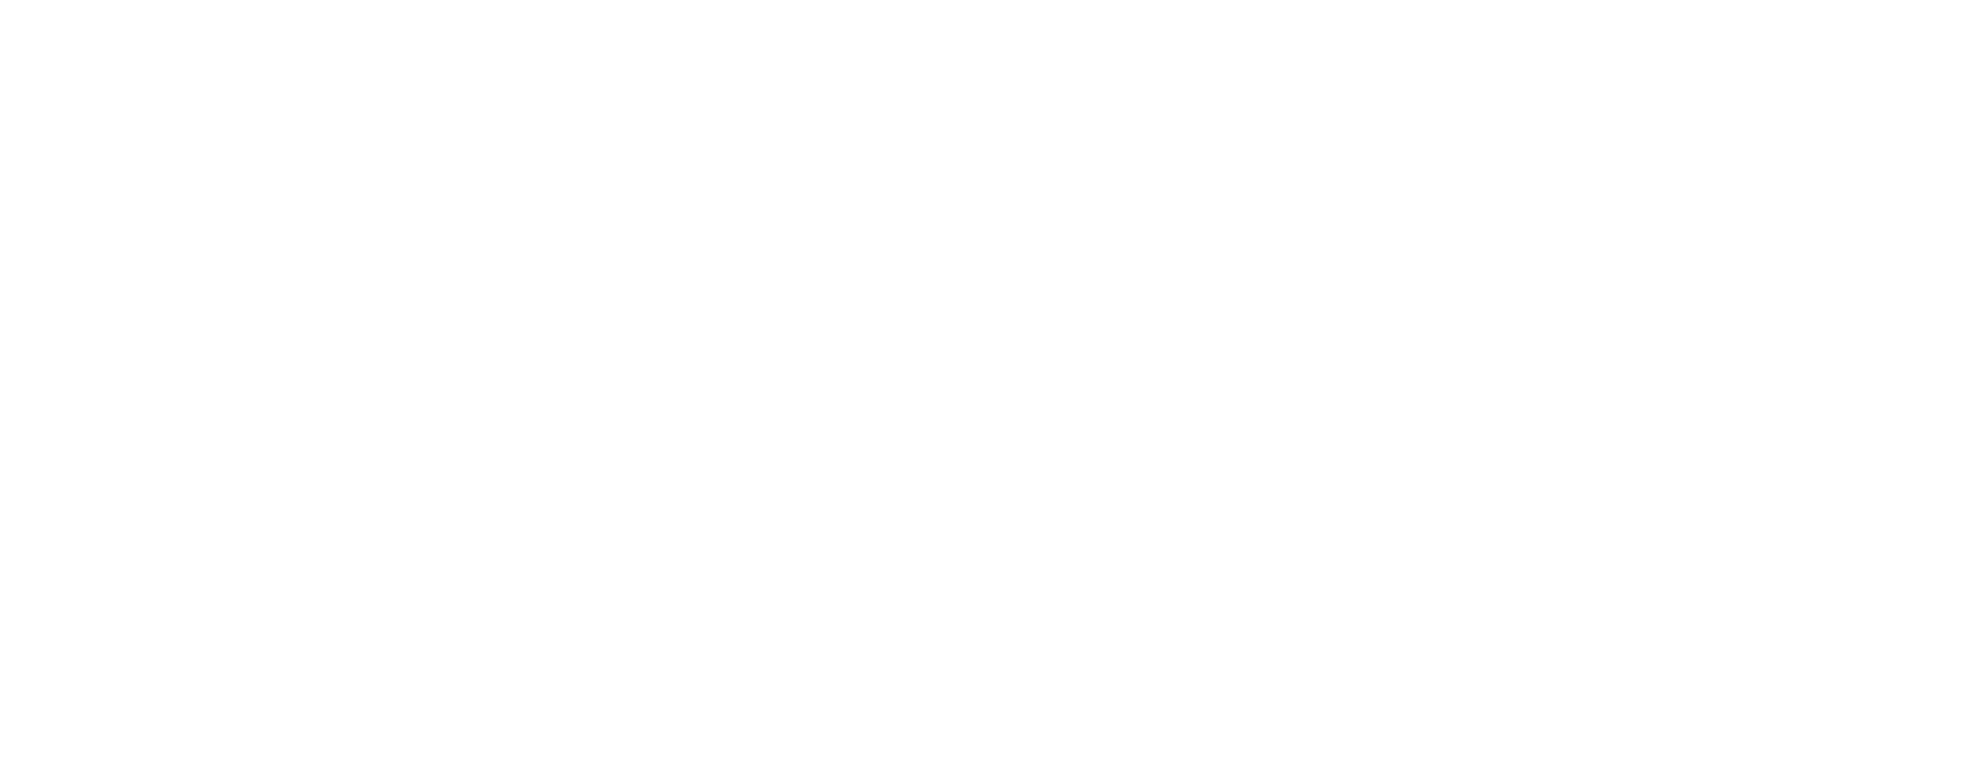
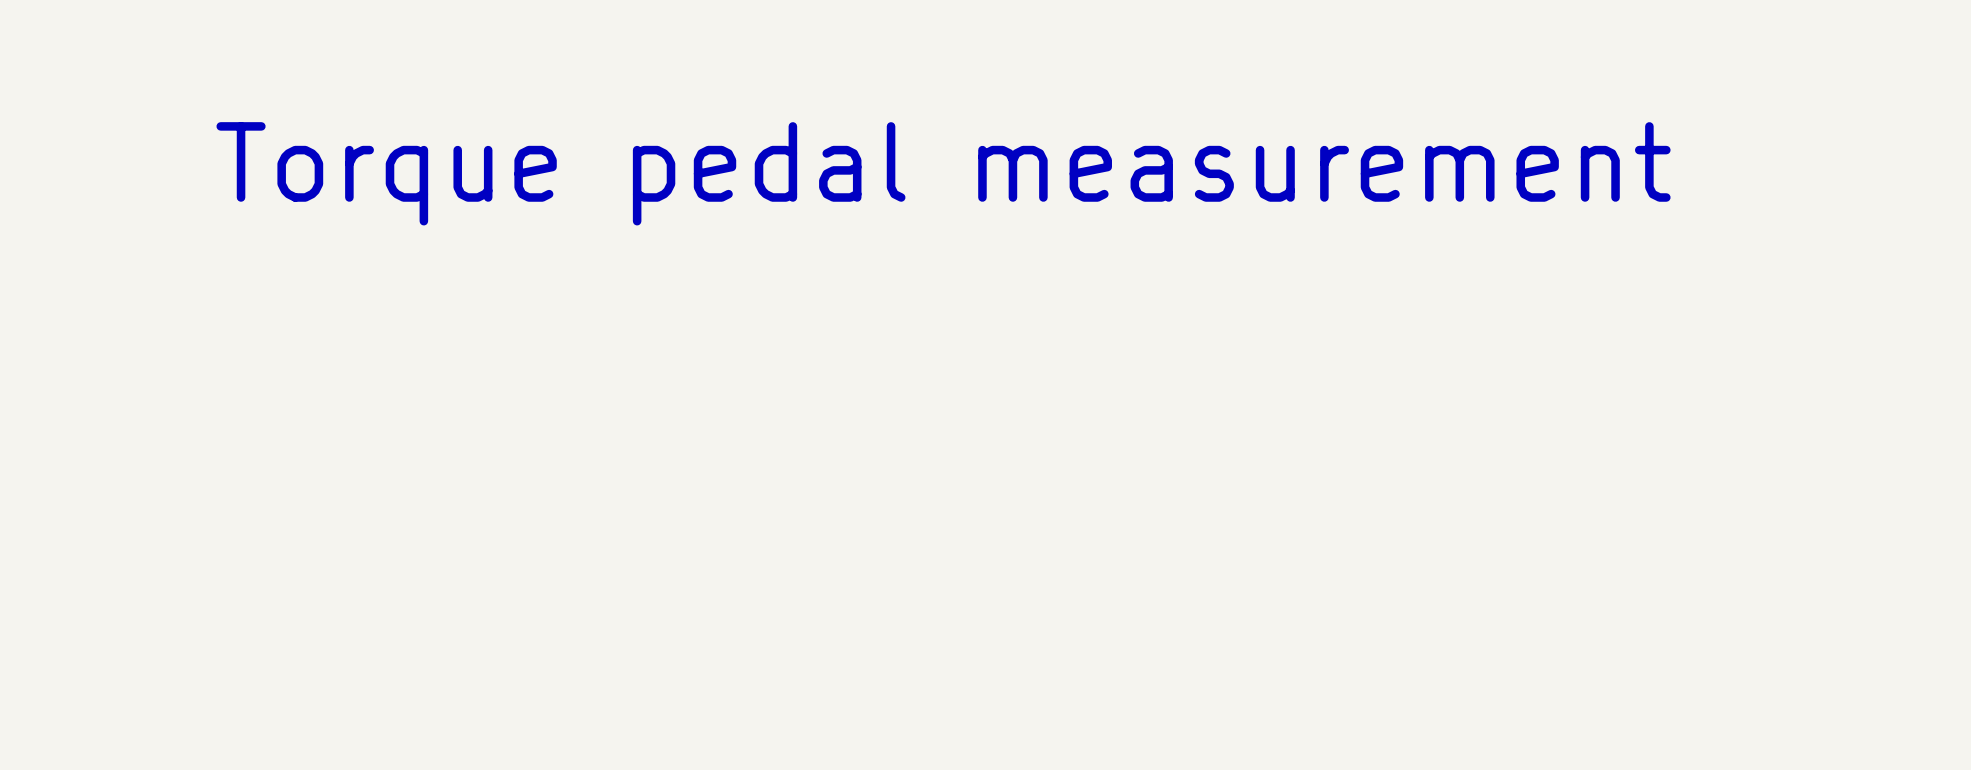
text: none -> Torque pedal measurement (943, 173)

